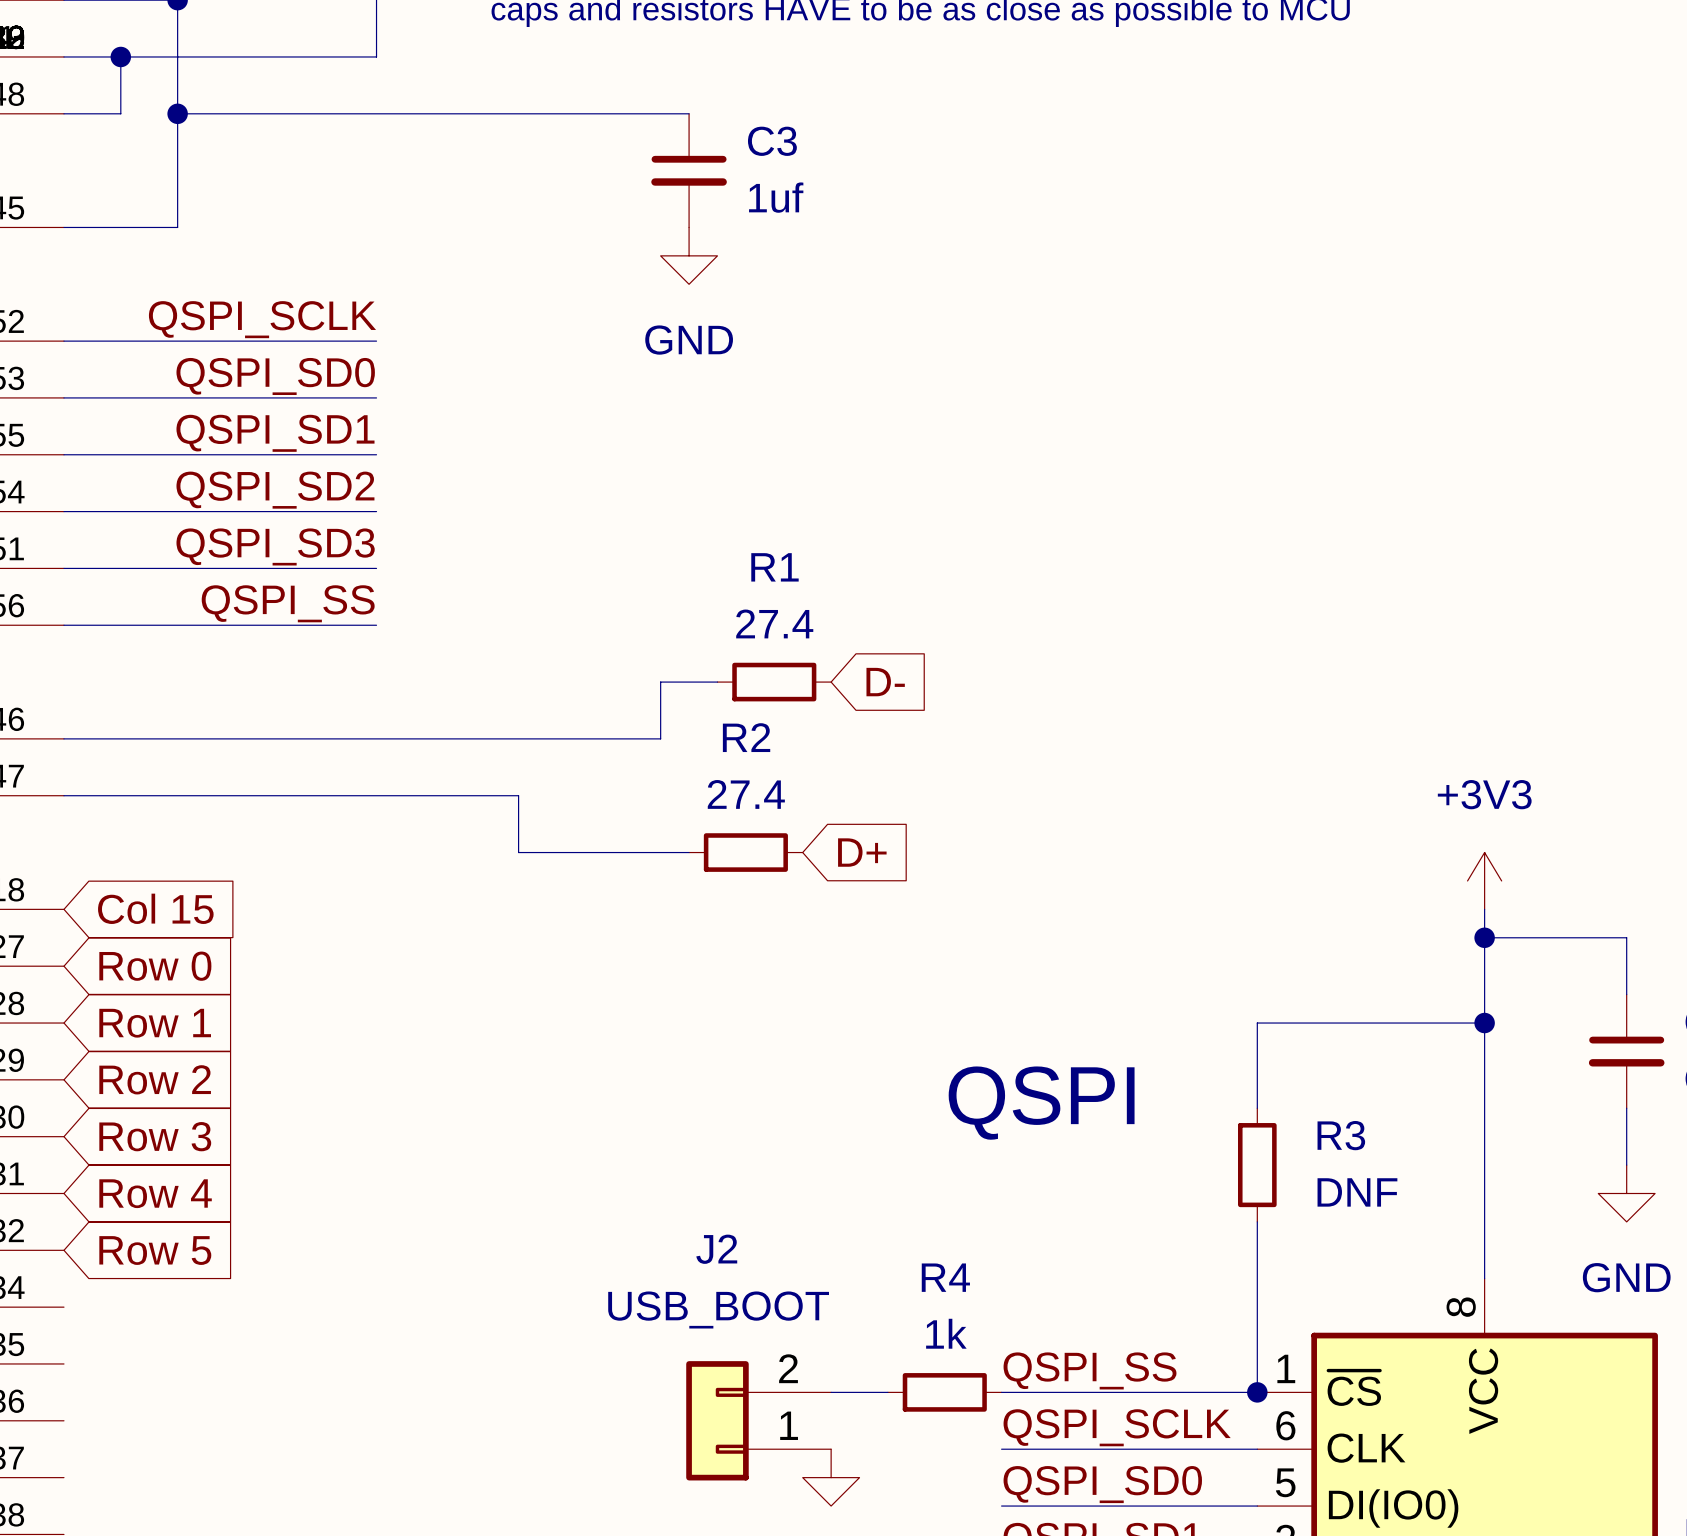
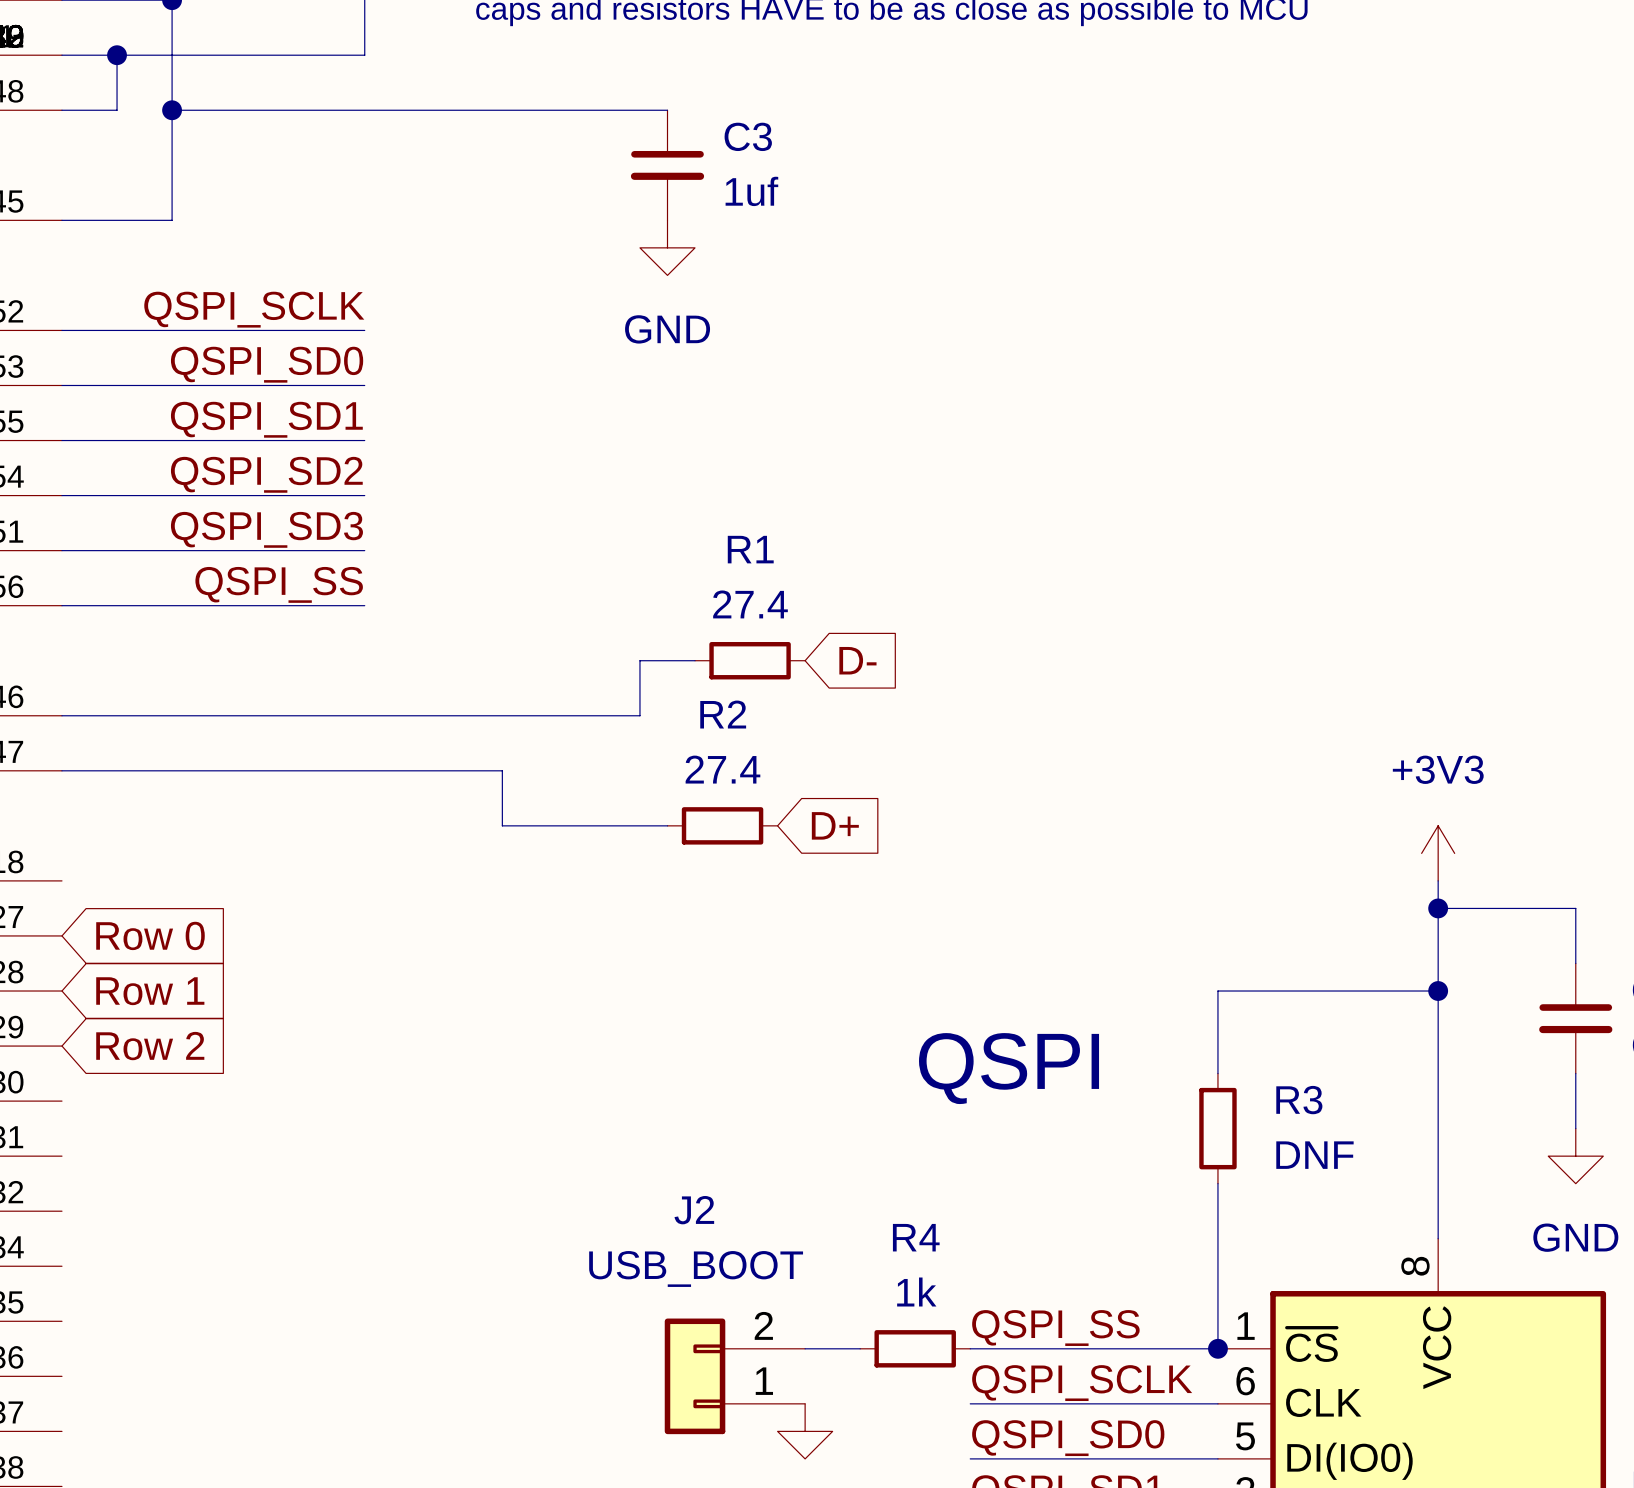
global label: Col 15 (155, 908) -> none
global label: Row 3 (155, 1136) -> none
global label: Row 4 (155, 1193) -> none
global label: Row 5 (155, 1250) -> none

